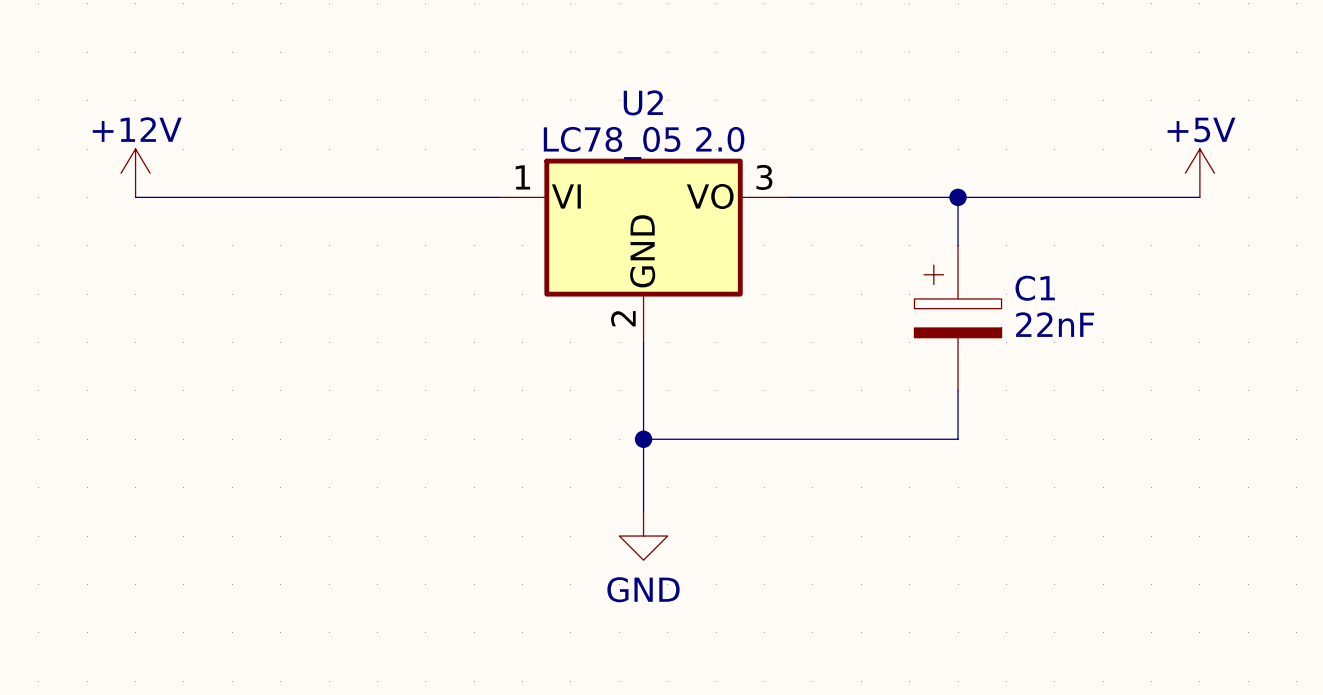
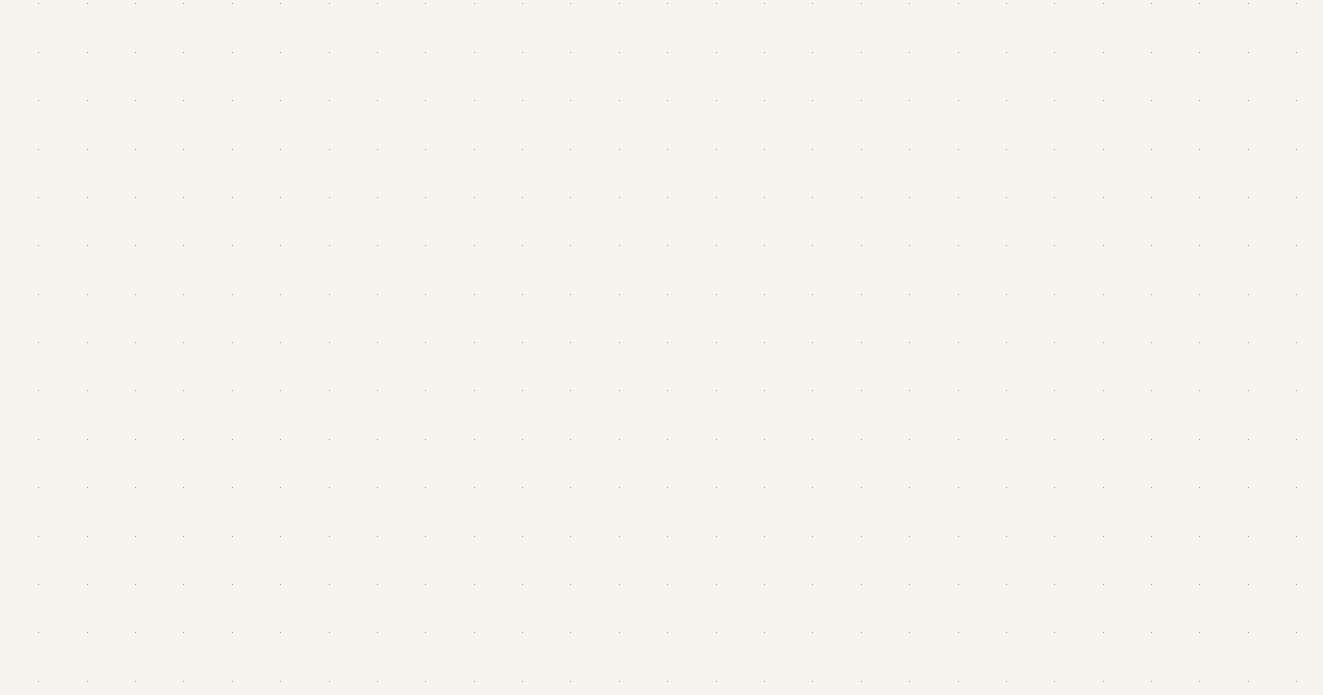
power symbol: +12V (135, 173) -> none
power symbol: +5V (1199, 173) -> none
wire: (135, 197) (498, 197) -> none
wire: (788, 197) (1199, 197) -> none
wire: (958, 197) (958, 245) -> none
junction: (958, 197) -> none
U2: LC78_05 2.0 (643, 250) -> none
C1: 22nF (958, 318) -> none
wire: (643, 342) (643, 511) -> none
wire: (958, 390) (958, 439) (643, 439) -> none
junction: (643, 439) -> none
power symbol: GND (643, 536) -> none

